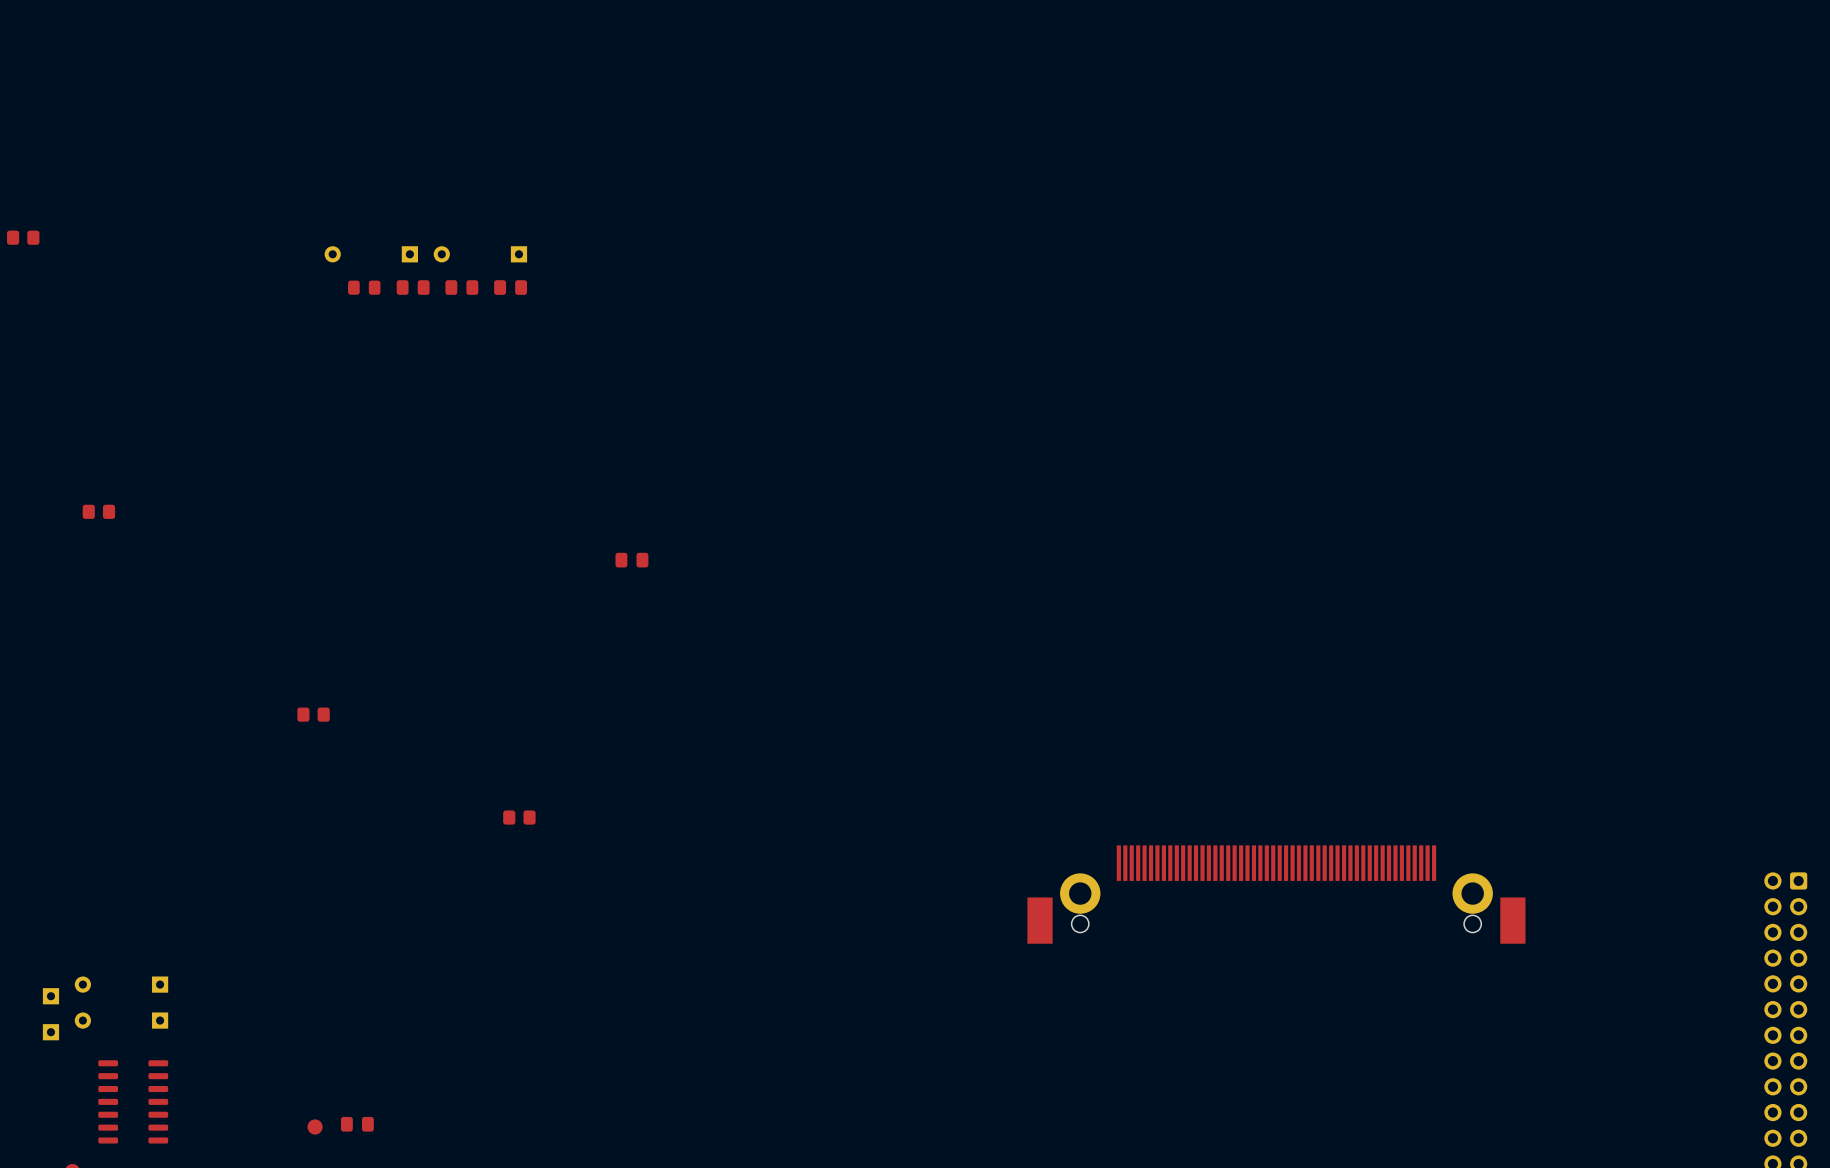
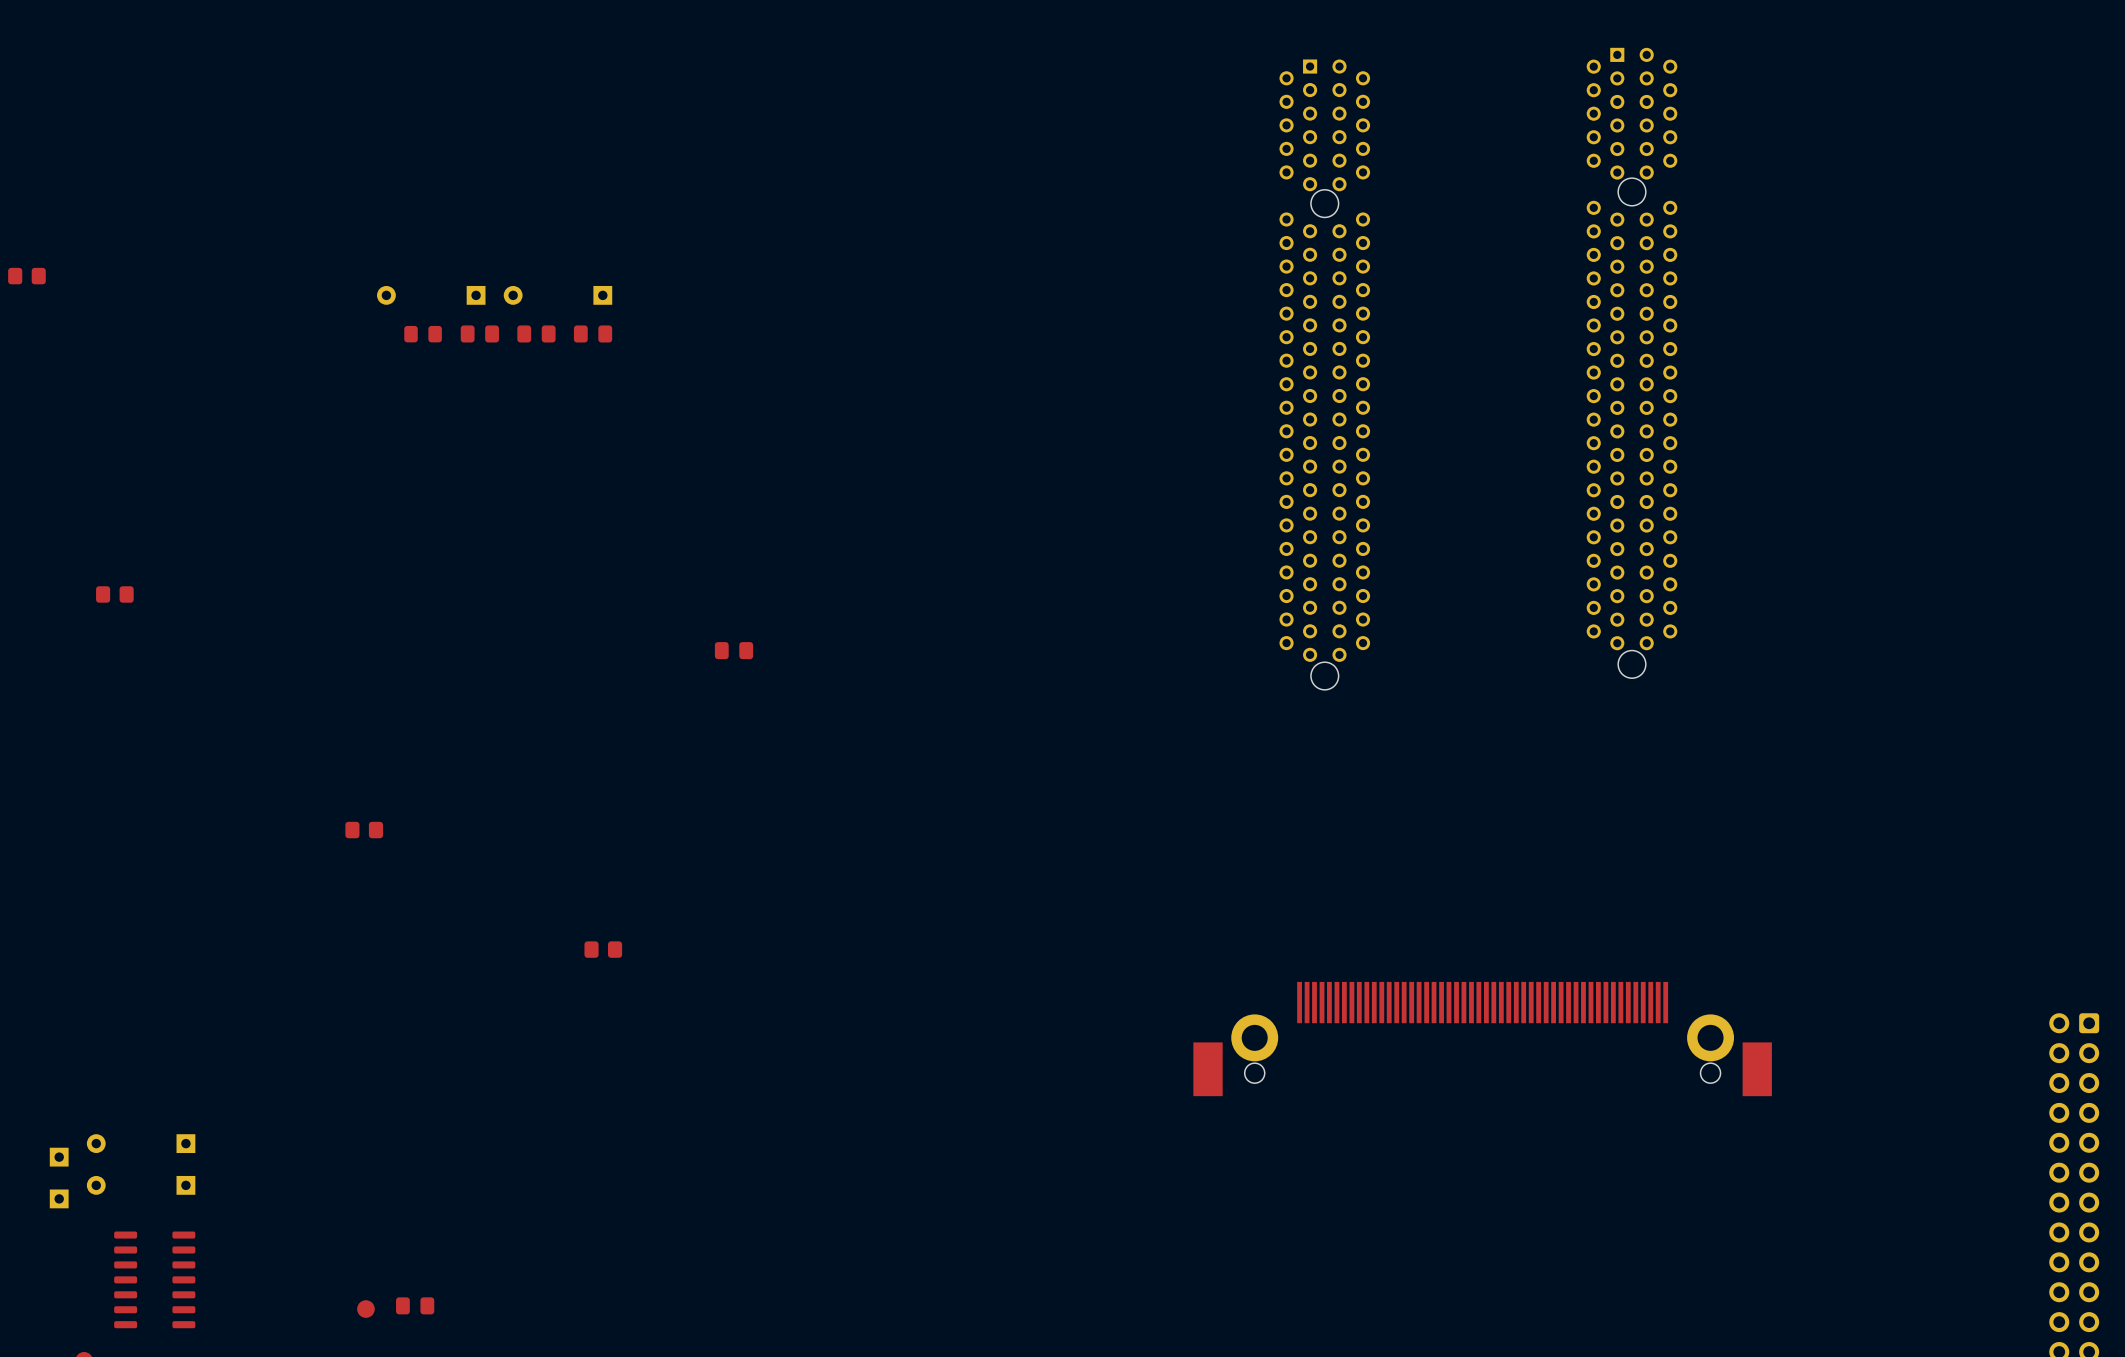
part: none -> (1632, 363)
part: none -> (1324, 374)

